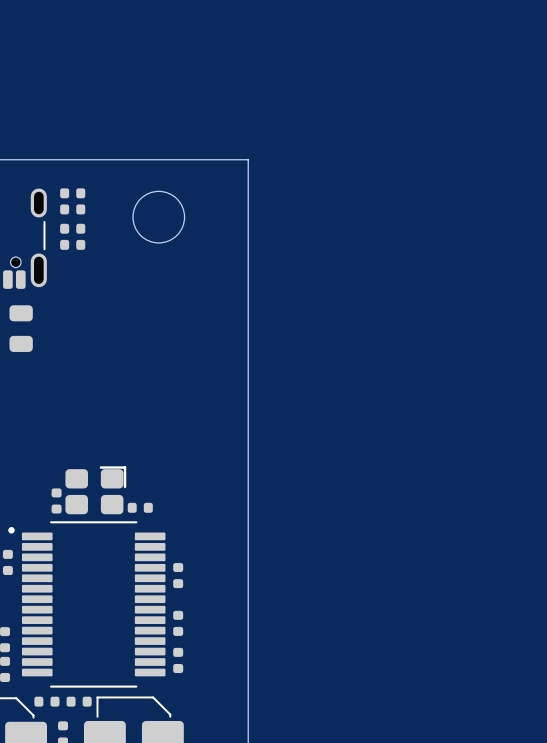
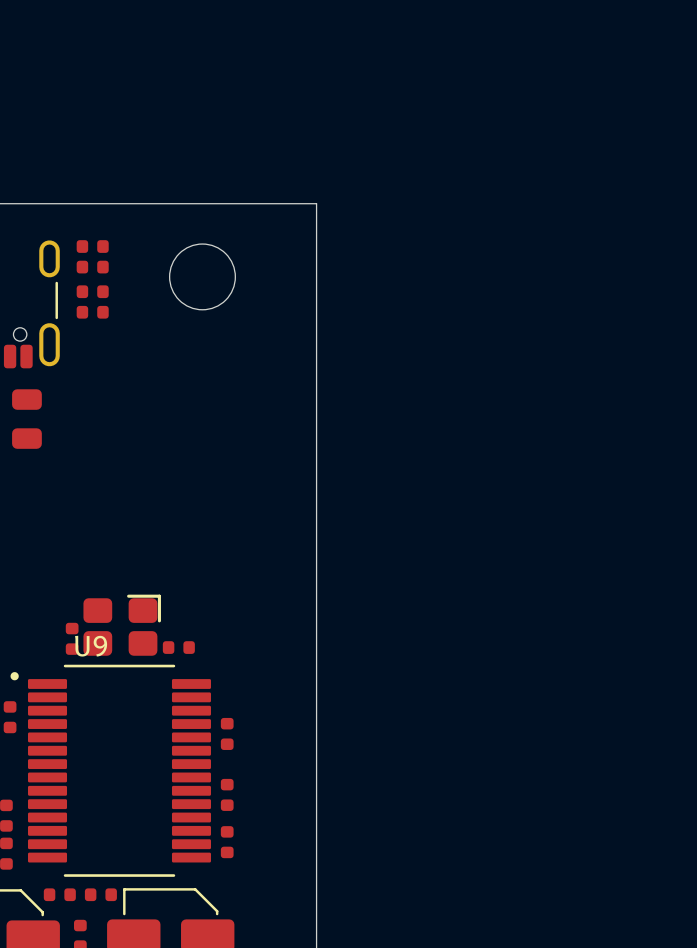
U9 name: none -> U9 (91, 646)

